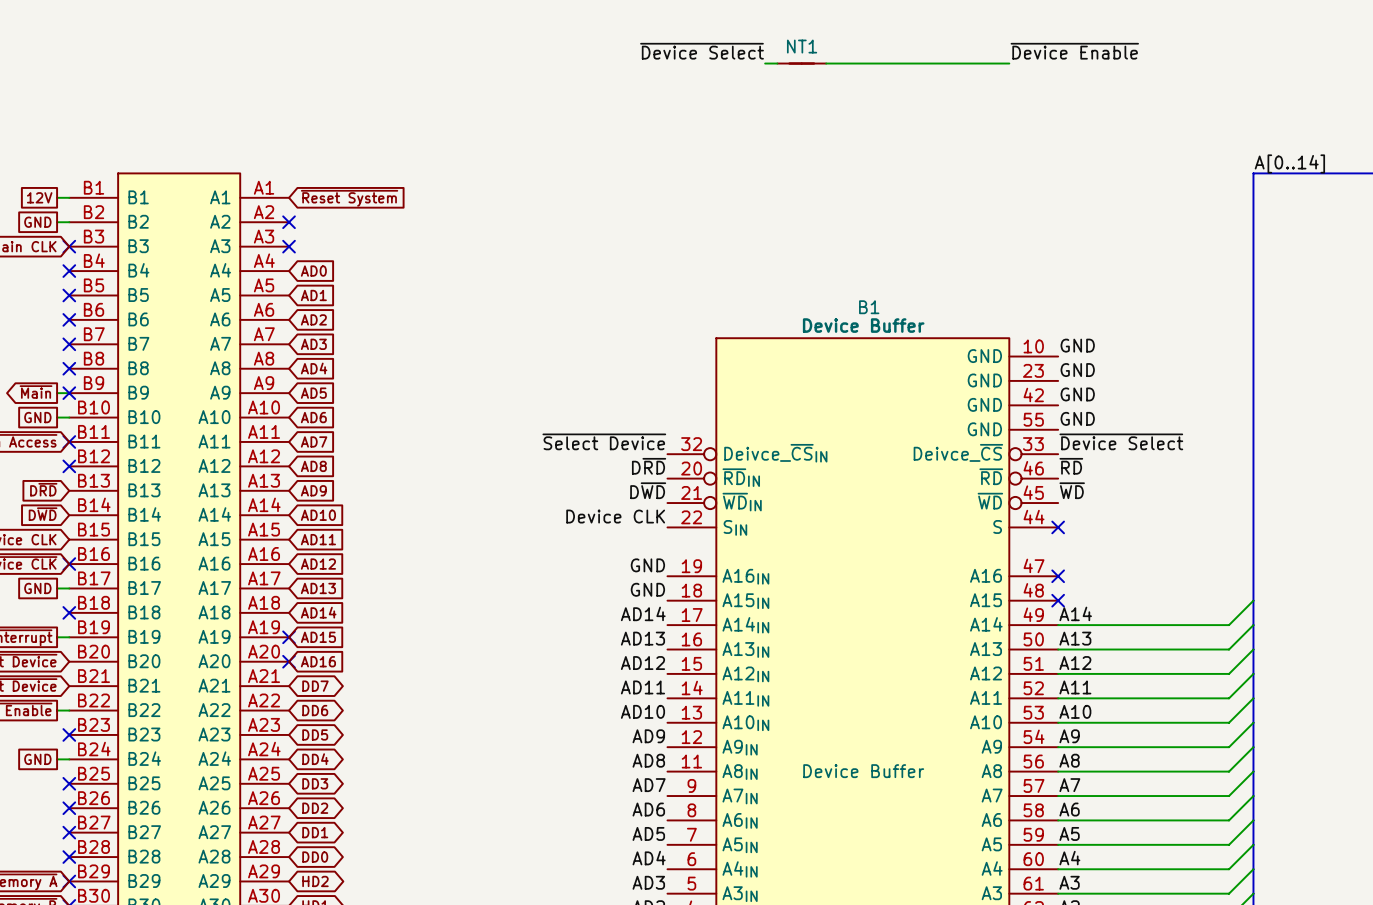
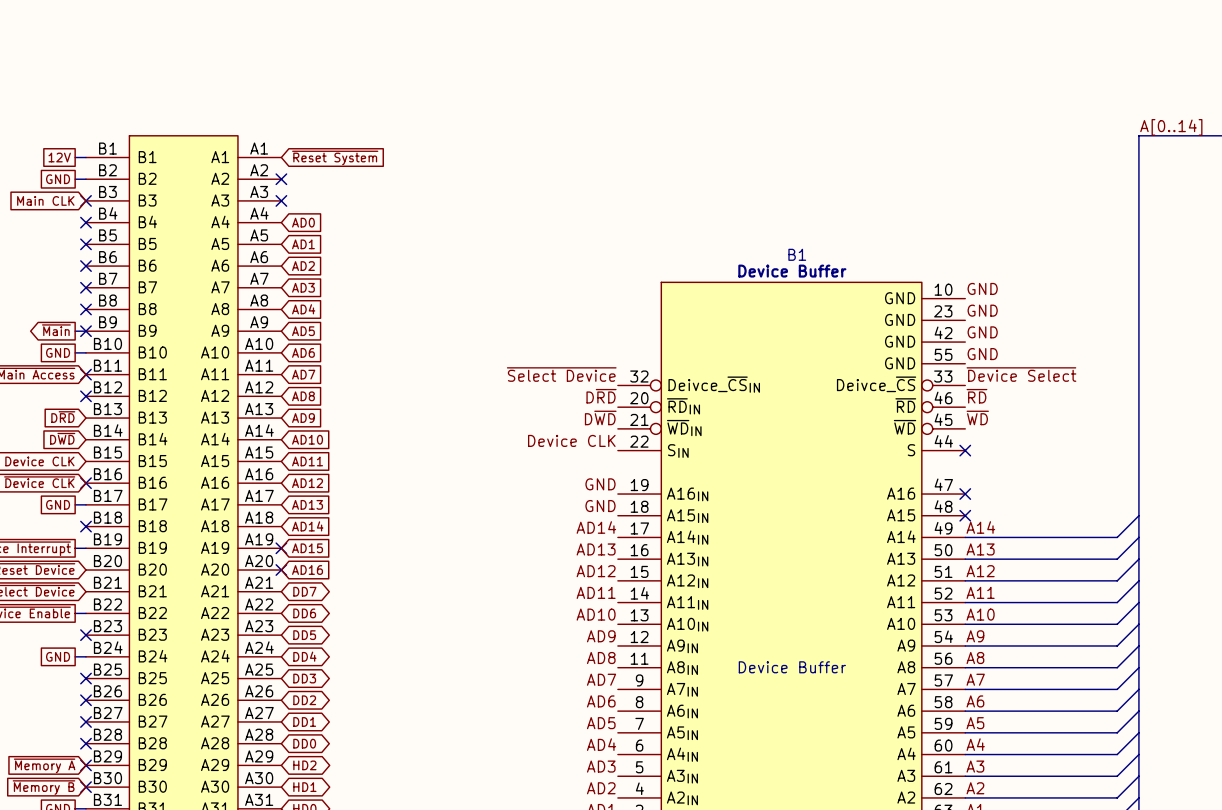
label: ~{Device Select} (702, 51) -> none
label: ~{Device Enable} (1074, 51) -> none
wire: (765, 63) (777, 63) -> none
NT1: (801, 63) -> none
wire: (826, 63) (1009, 63) -> none

